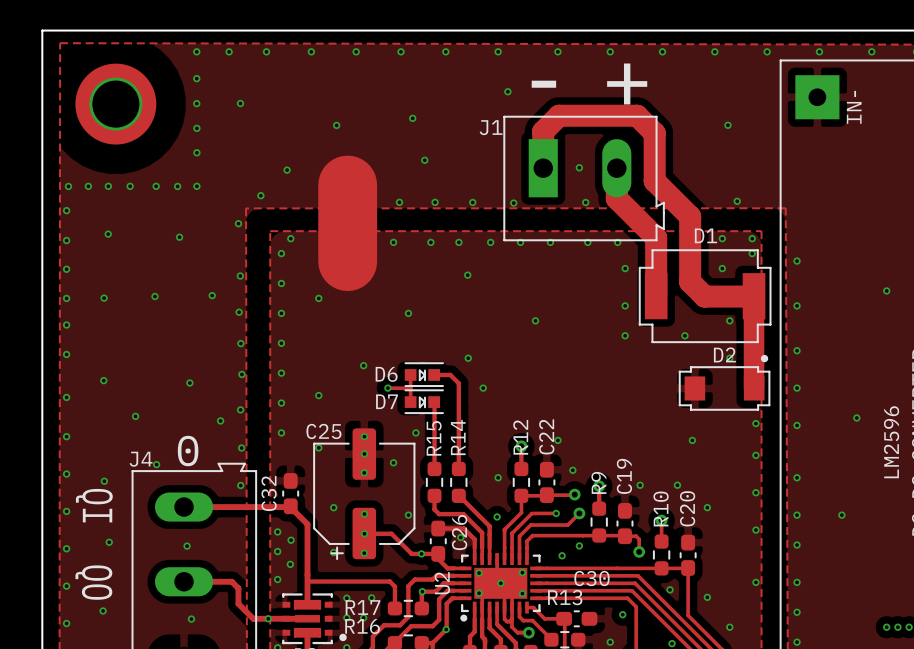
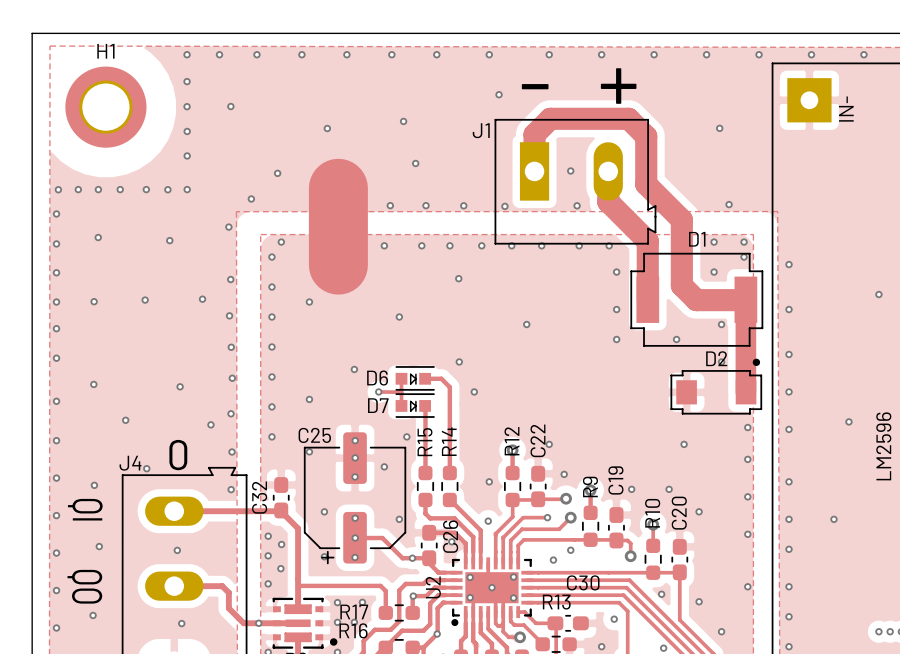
H1 name: none -> H1 (105, 51)

